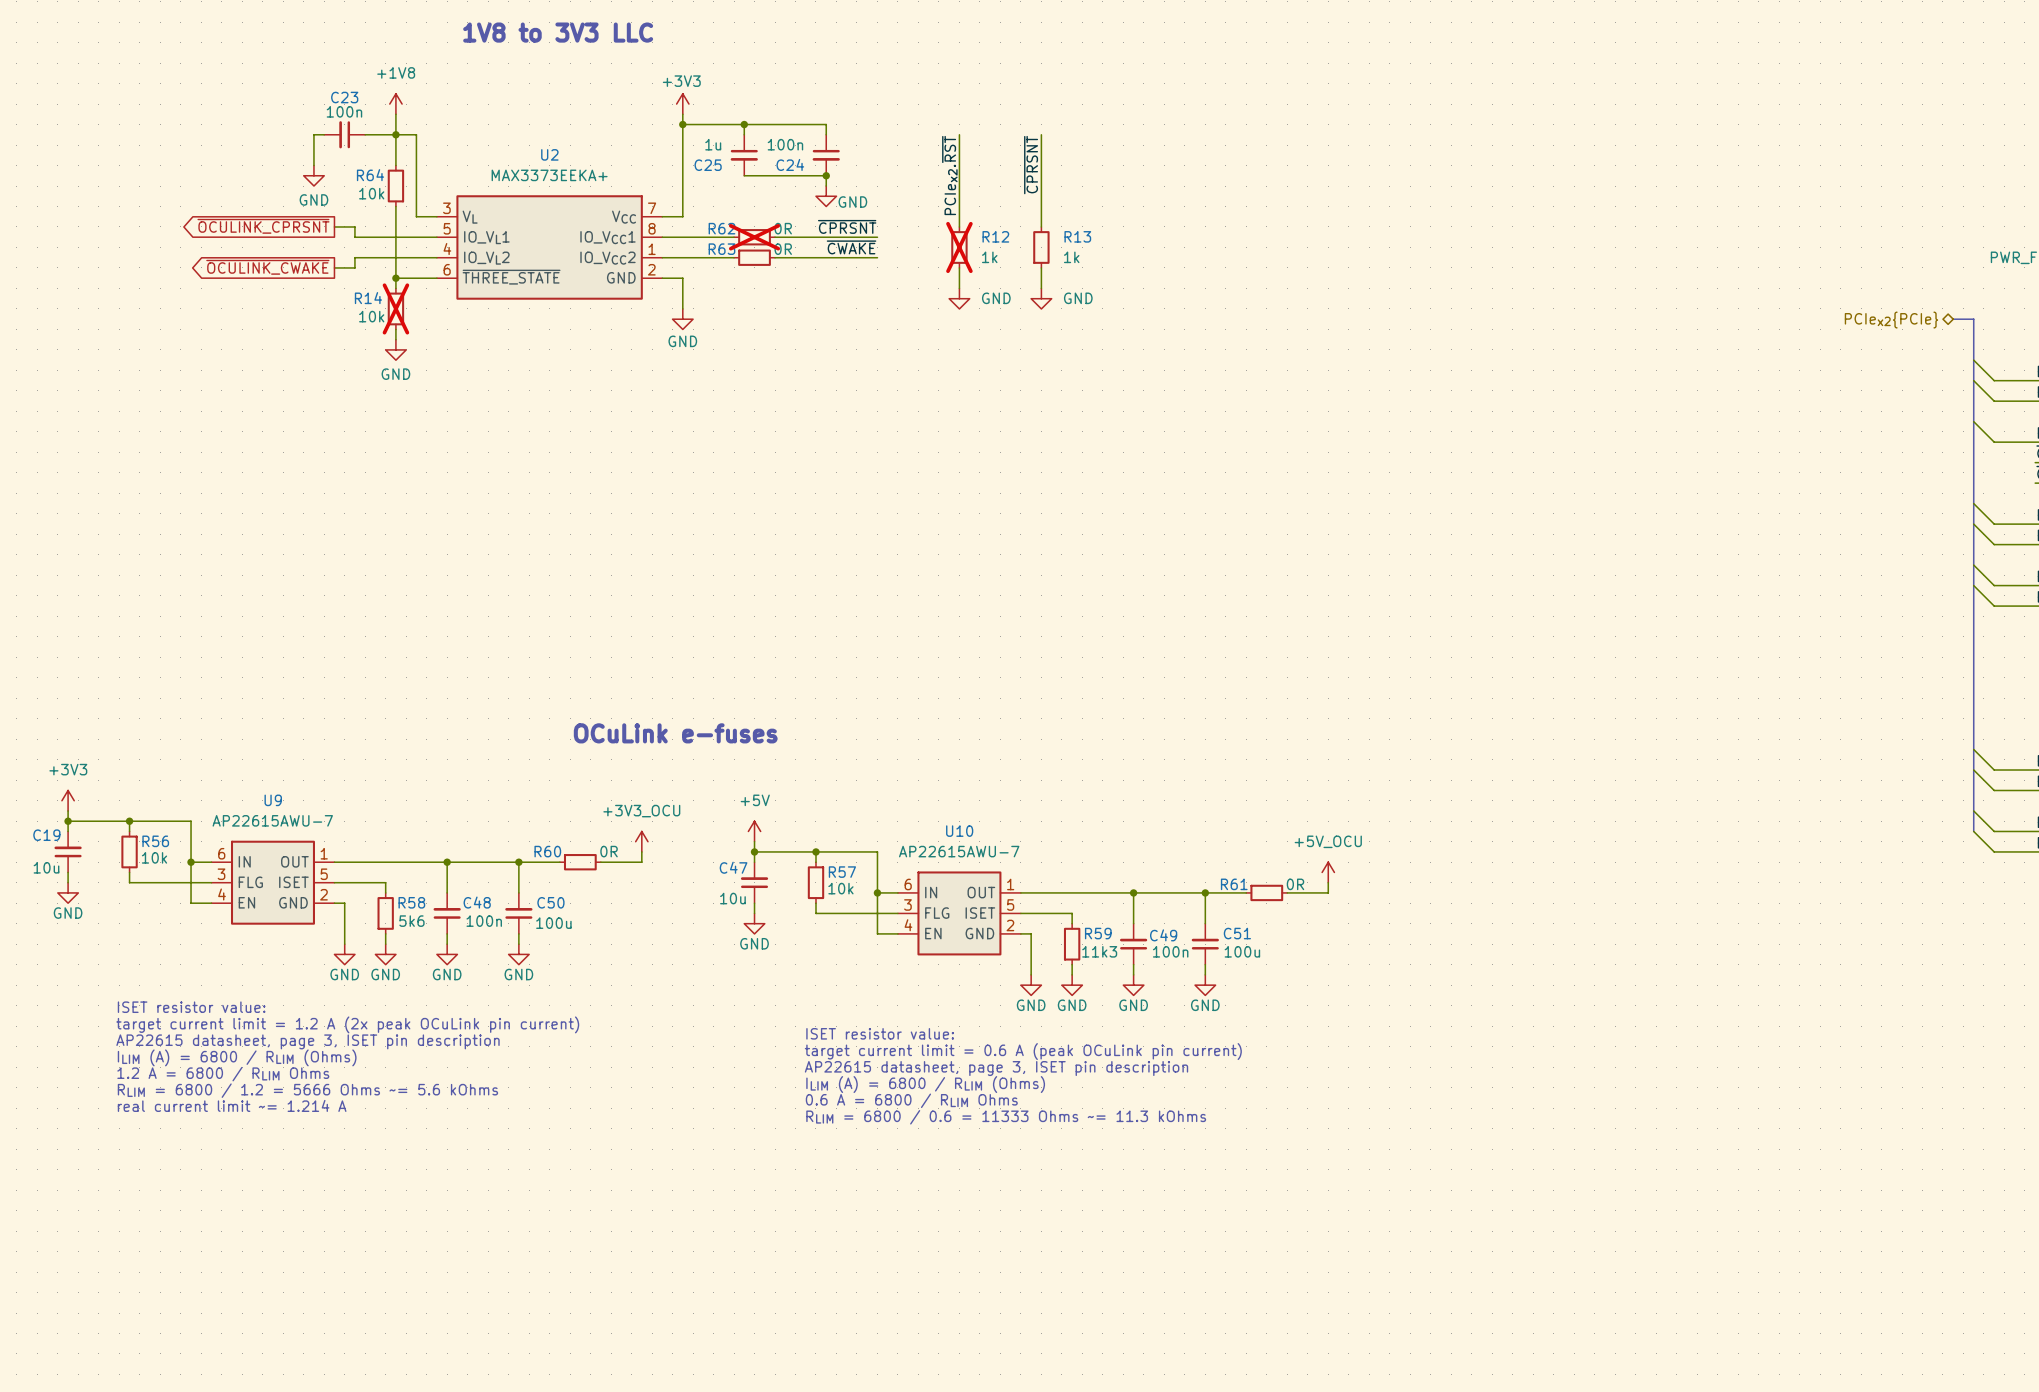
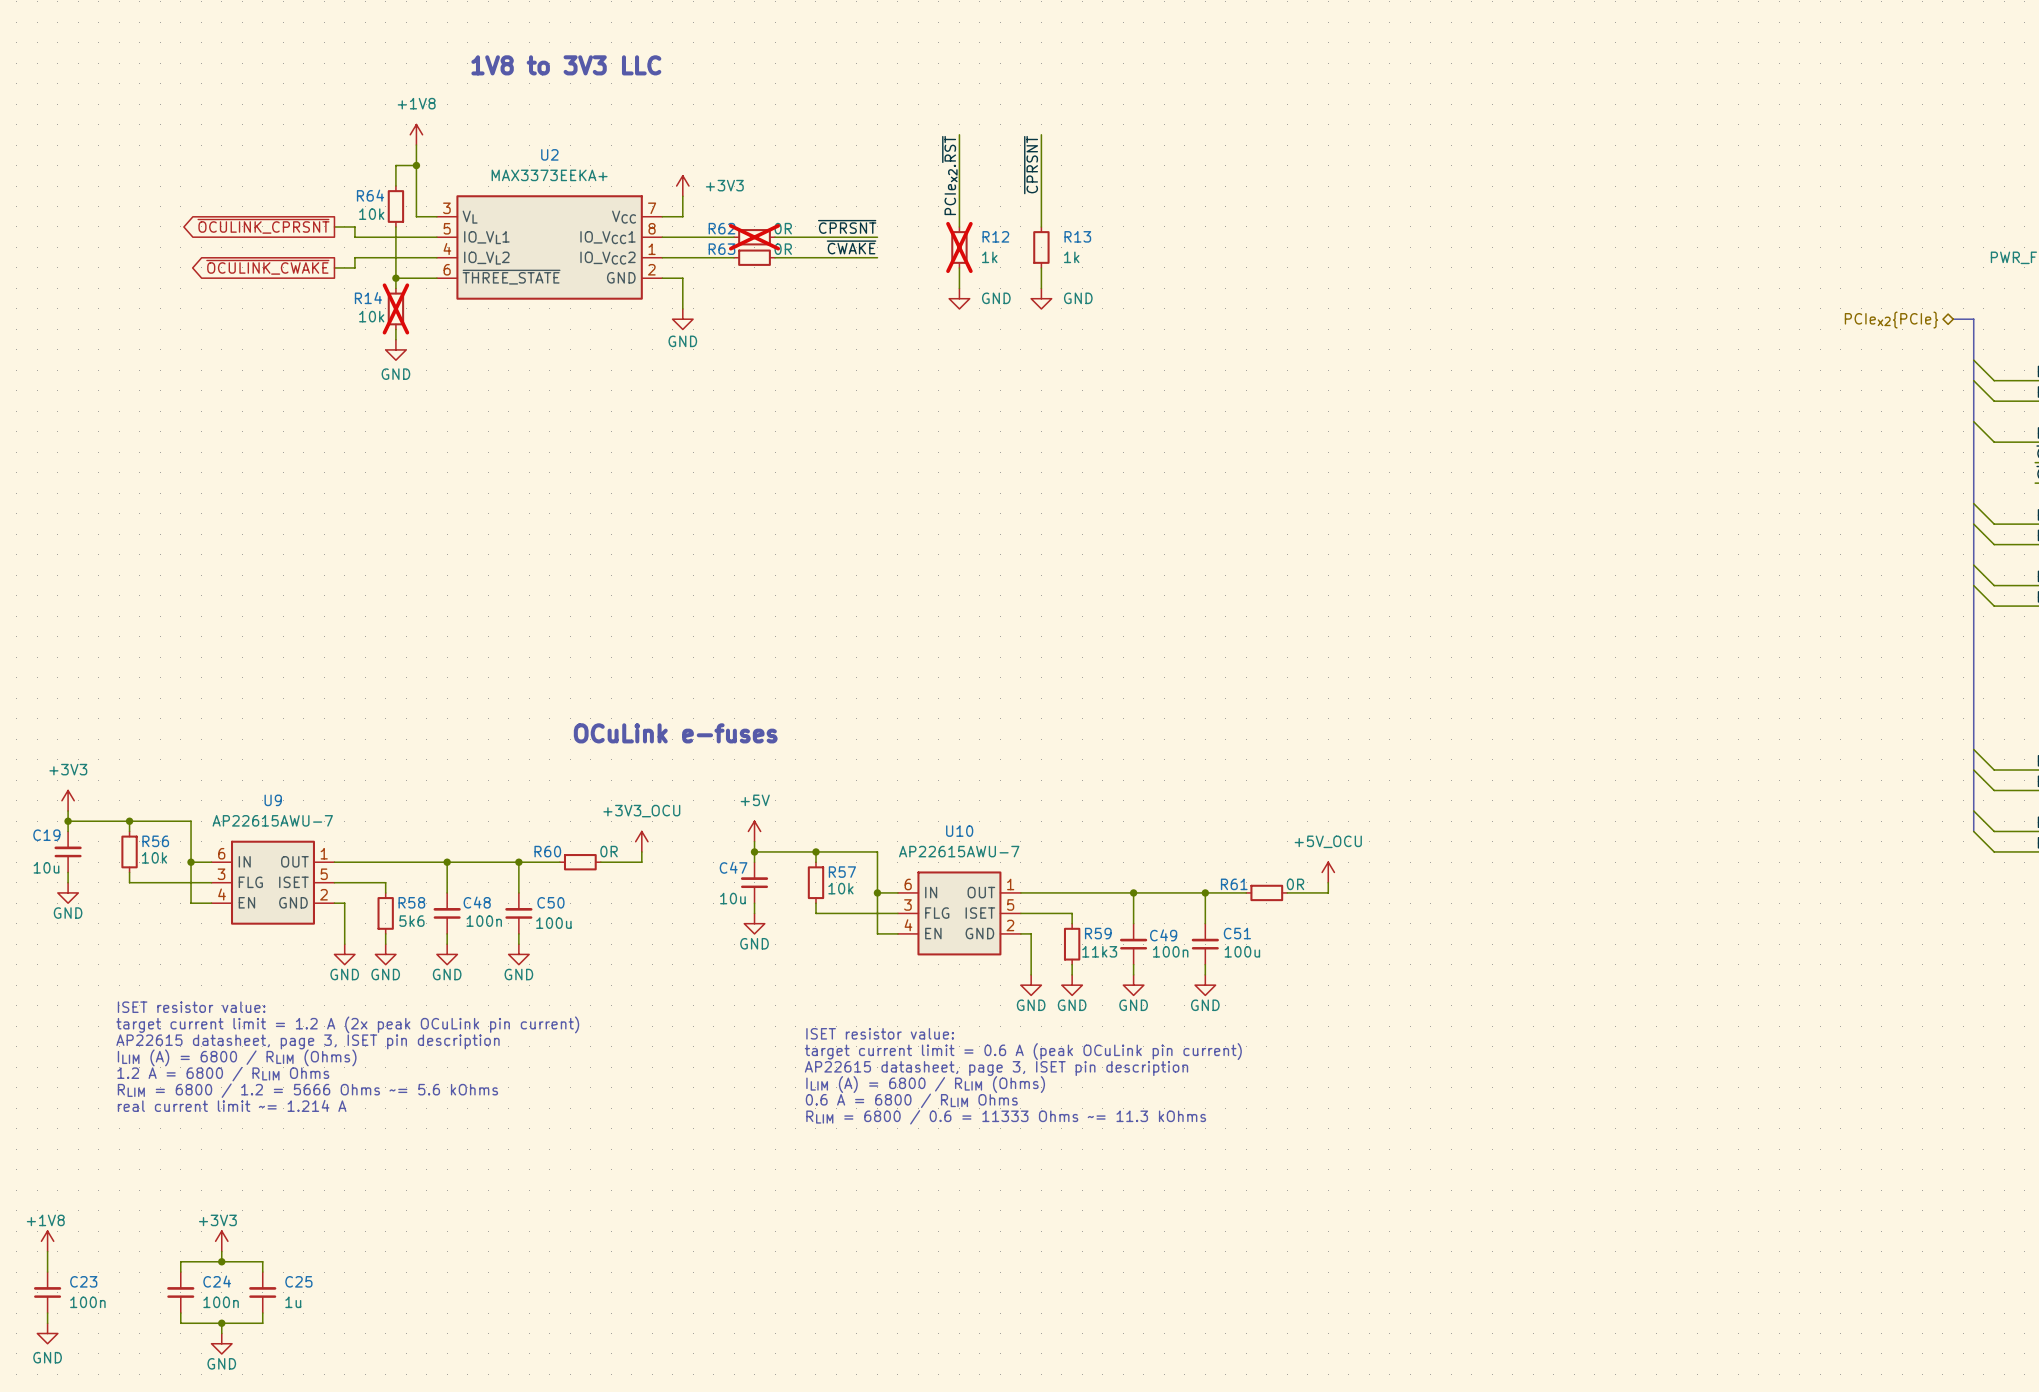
text position: 1V8 to 3V3 LLC (558, 32) -> 1V8 to 3V3 LLC (566, 65)
power symbol text position: +3V3 (681, 81) -> +3V3 (724, 185)
power symbol position: +1V8 (395, 104) -> +1V8 (416, 134)
power symbol position: +3V3 (682, 104) -> +3V3 (682, 186)
C23 text position: 100n (344, 111) -> 100n (87, 1302)
wire: (395, 114) (395, 165) -> none
wire: (682, 114) (682, 196) -> none
wire: (682, 124) (826, 124) (826, 134) -> none
junction: (682, 124) -> none
wire: (744, 124) (744, 134) -> none
junction: (744, 124) -> none
wire: (324, 134) (313, 134) (313, 165) -> none
C23 rotation: 0° (344, 134) -> 90° clockwise (47, 1292)
C23 position: (344, 134) -> (47, 1292)
wire: (365, 134) (416, 134) (416, 145) -> none
junction position: (395, 134) -> (416, 165)
C25 rotation: 0° (744, 155) -> 180° (262, 1292)
C25 position: (744, 155) -> (262, 1292)
C24 rotation: 0° (826, 155) -> 180° (180, 1292)
C24 position: (826, 155) -> (180, 1292)
wire: none -> (416, 165) (395, 165) (395, 186)
power symbol: GND (313, 175) -> none
wire: (744, 175) (826, 175) (826, 186) -> none
junction: (826, 175) -> none
R64 position: (395, 186) -> (395, 206)
power symbol: GND (826, 196) -> none
wire: (395, 206) (395, 226) -> none
power symbol: none -> +1V8 (47, 1241)
power symbol: none -> +3V3 (221, 1241)
wire: none -> (47, 1251) (47, 1272)
wire: none -> (221, 1251) (221, 1261)
junction: none -> (221, 1261)
wire: none -> (180, 1272) (180, 1261) (262, 1261) (262, 1272)
wire: none -> (47, 1313) (47, 1323)
wire: none -> (180, 1313) (180, 1323) (262, 1323) (262, 1313)
wire: none -> (221, 1323) (221, 1333)
junction: none -> (221, 1323)
power symbol: none -> GND (47, 1333)
power symbol: none -> GND (221, 1343)

